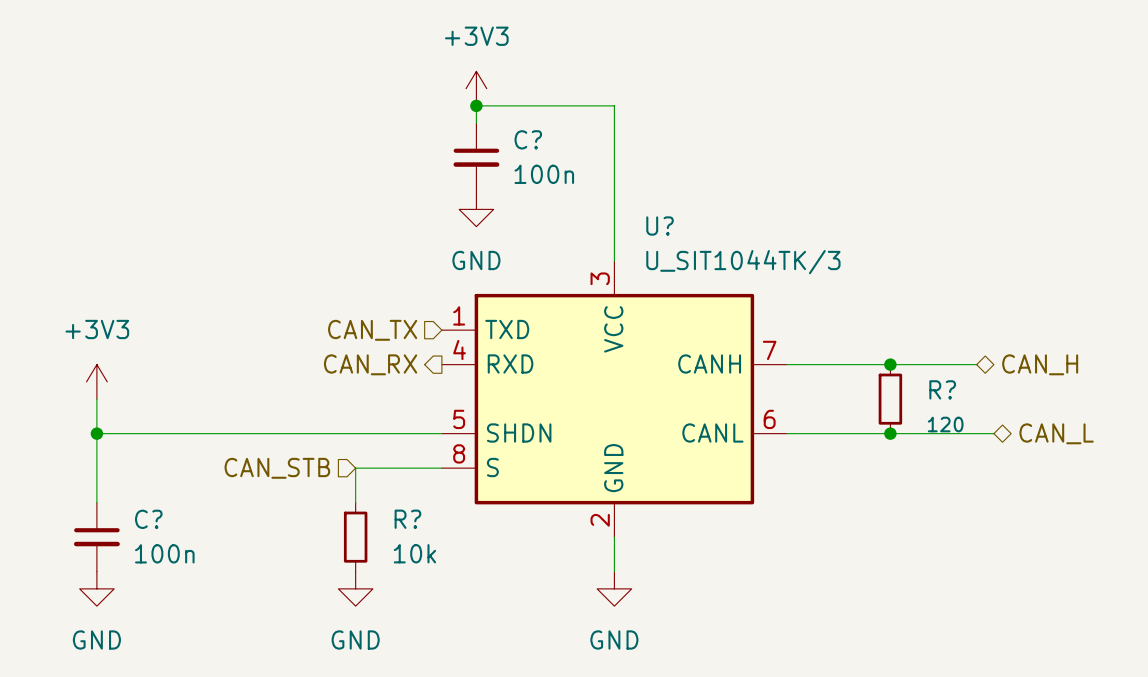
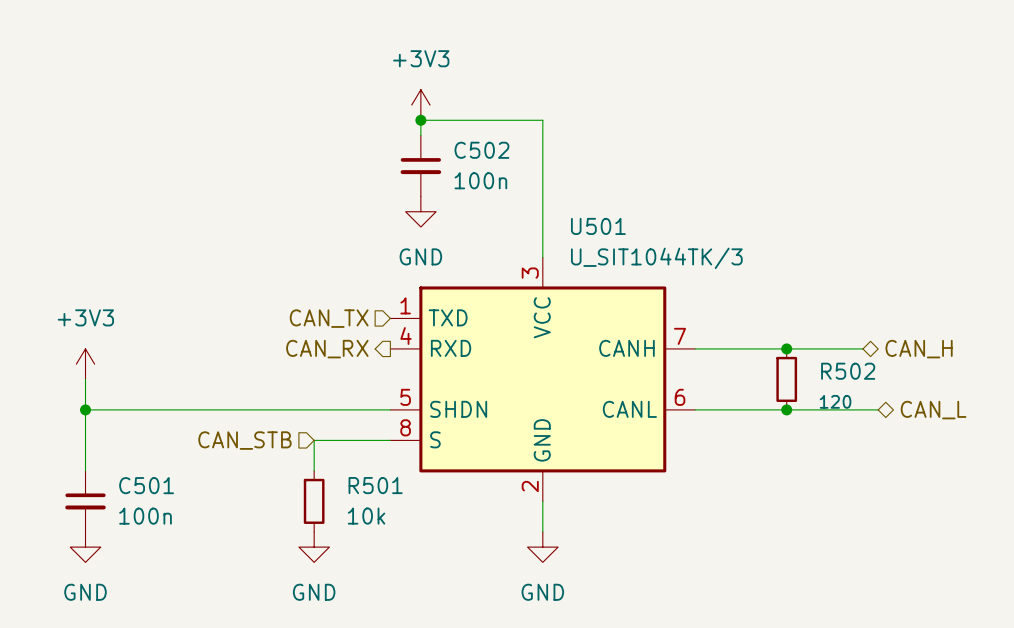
C? name: C? (528, 139) -> C502 (481, 150)
U? name: U? (660, 225) -> U501 (598, 226)
R? name: R? (942, 389) -> R502 (848, 371)
C? name: C? (148, 519) -> C501 (146, 485)
R? name: R? (407, 519) -> R501 (375, 485)

